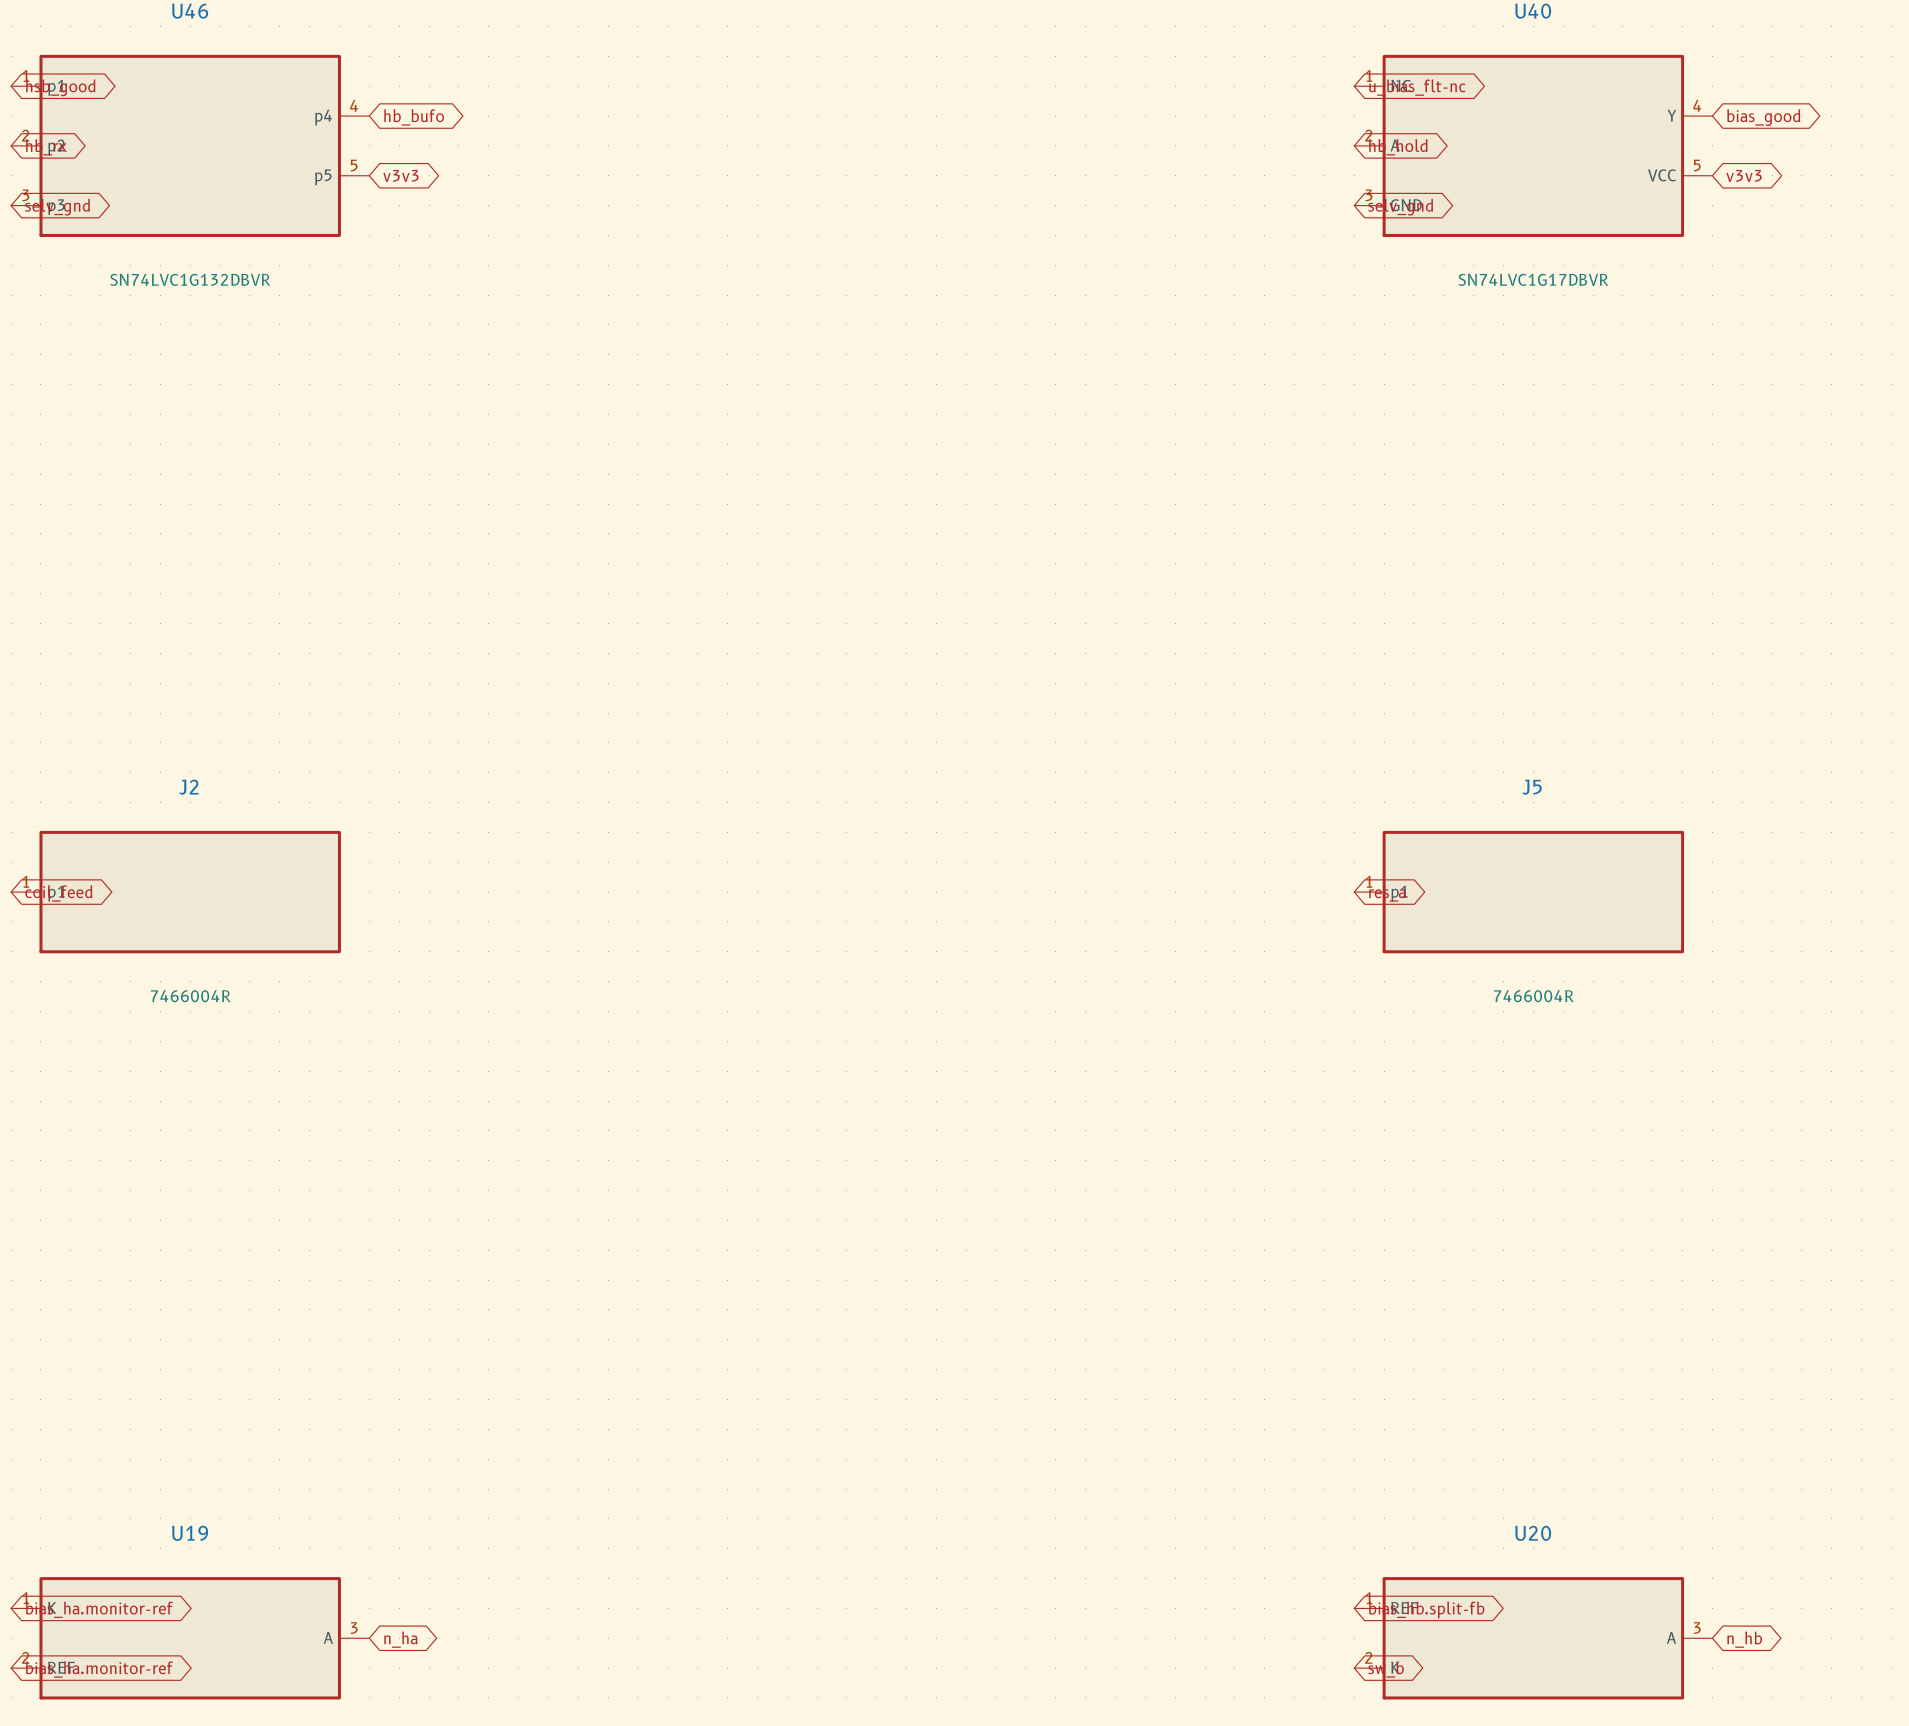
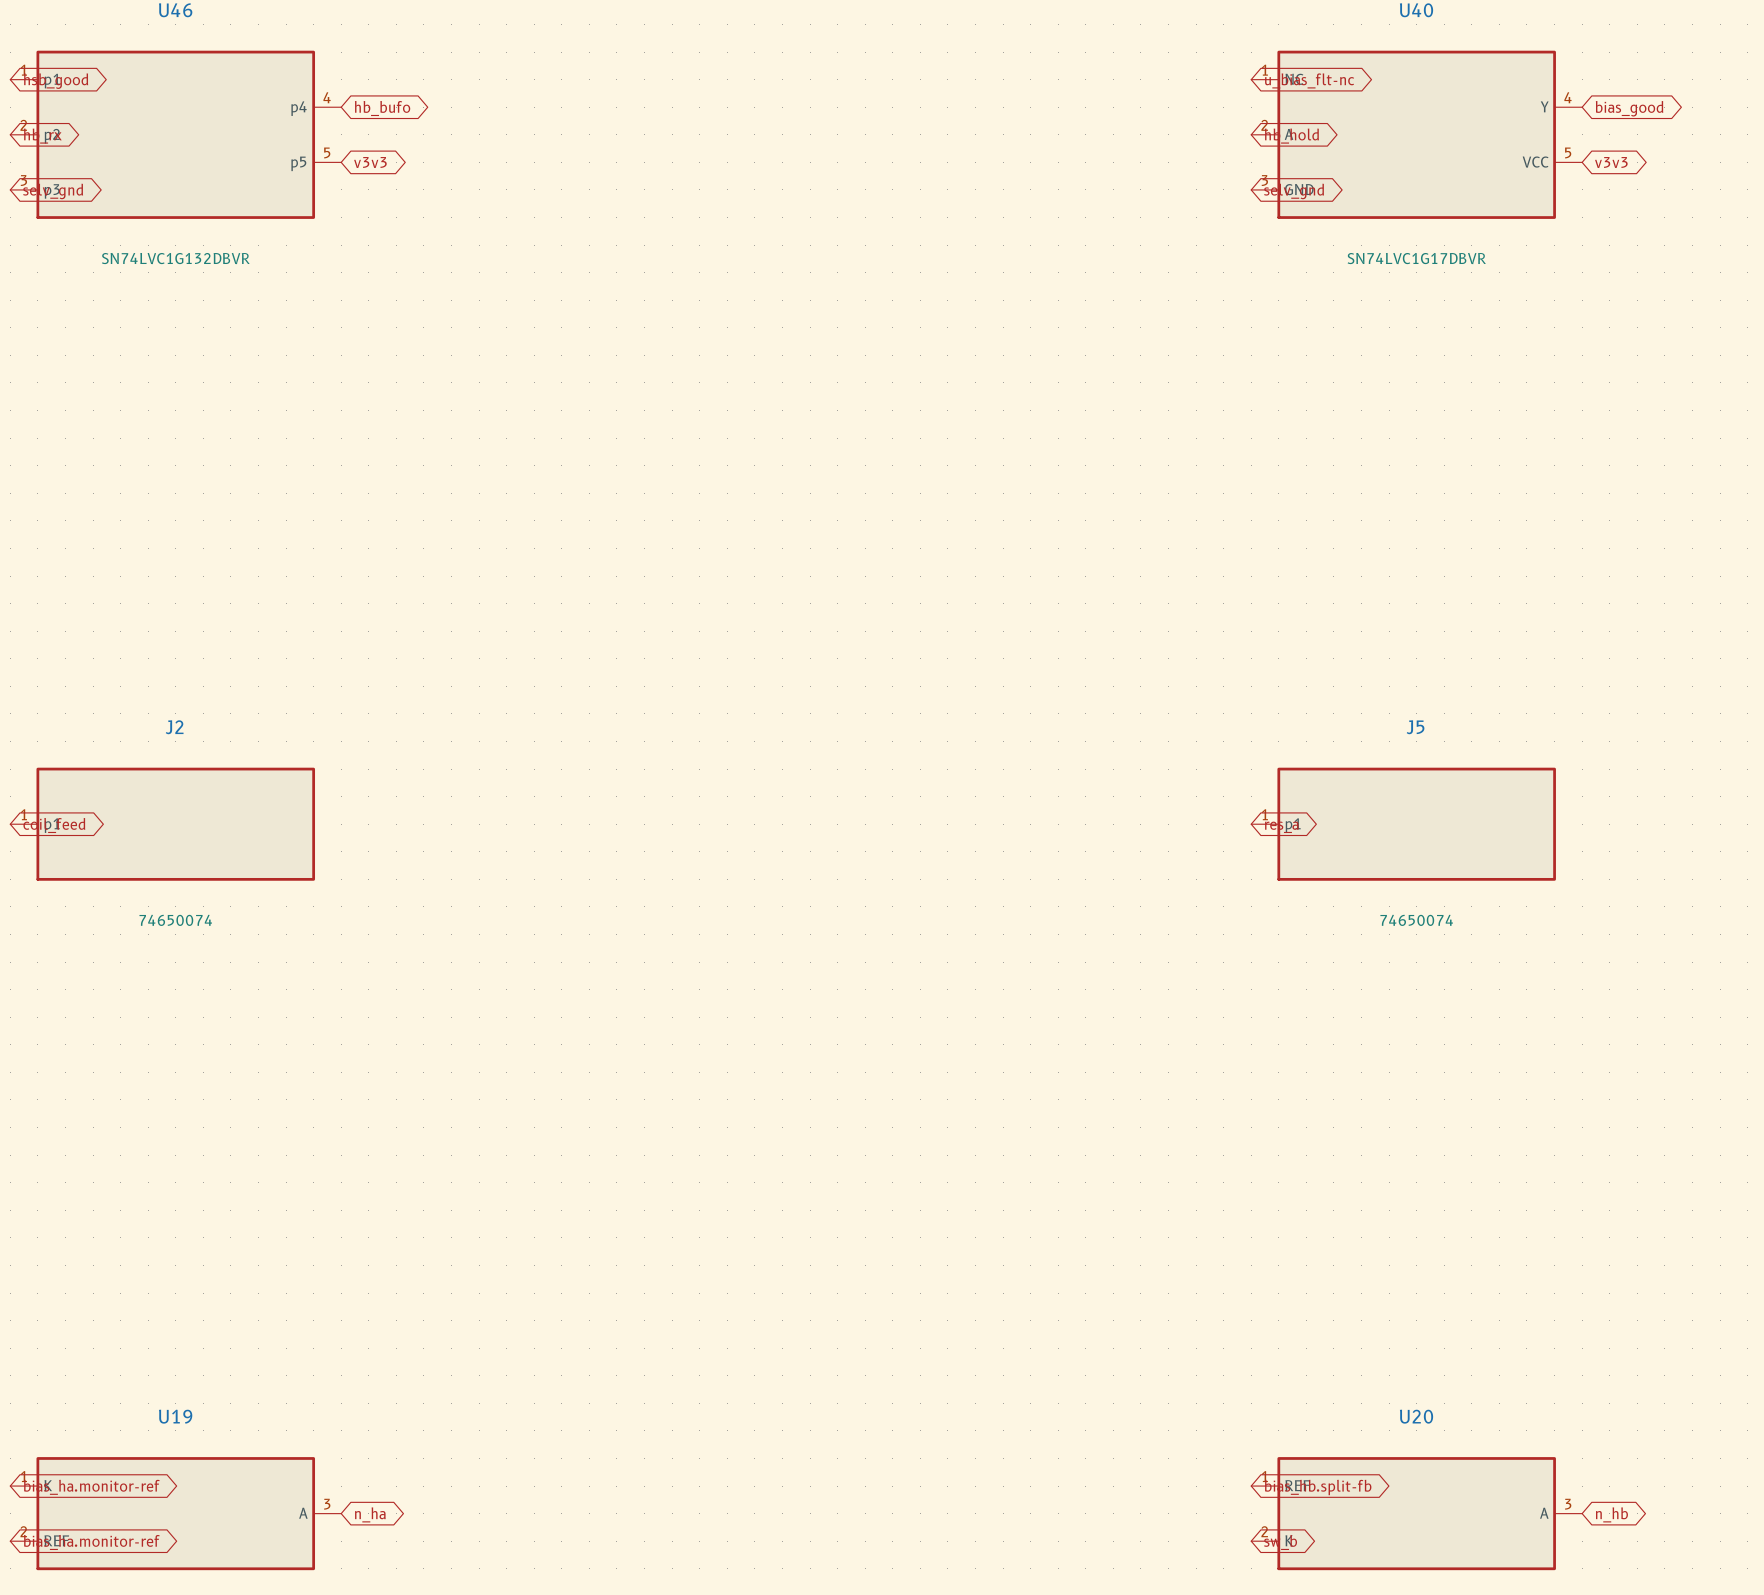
J2 value: 7466004R (190, 996) -> 74650074 (175, 920)
J5 value: 7466004R (1533, 996) -> 74650074 (1416, 920)

